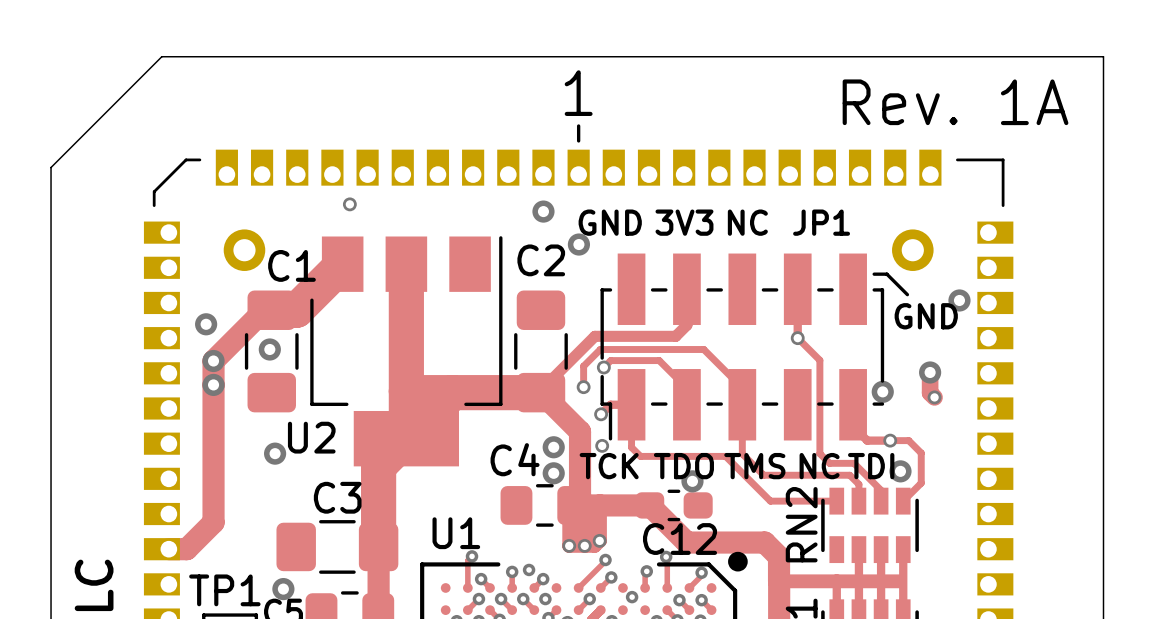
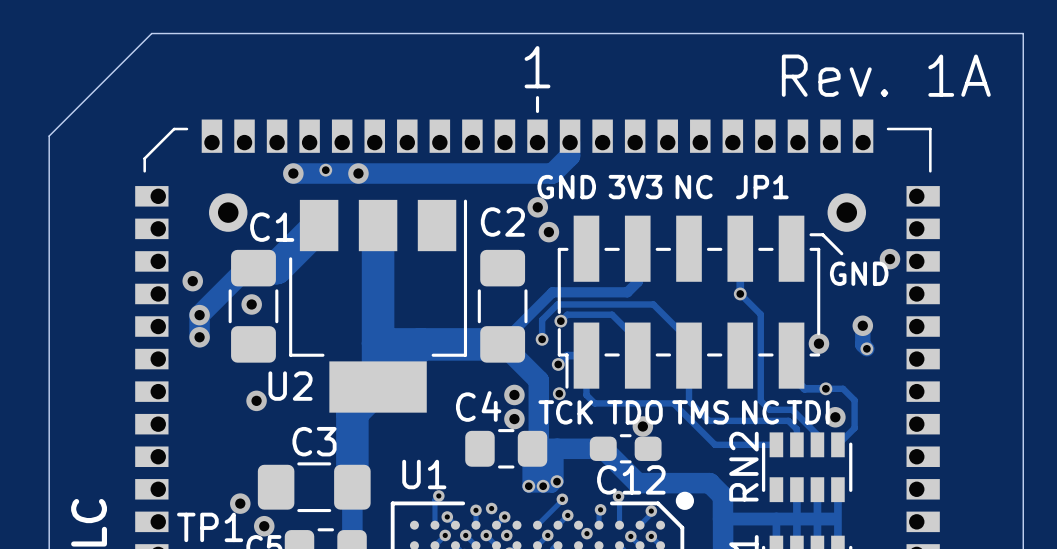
track: none -> (570, 142) (570, 155) (552, 173) (293, 173)
via: none -> (293, 173)
via: none -> (358, 173)
via position: (543, 211) -> (548, 232)
track: (213, 384) (213, 522) (186, 549) (168, 549) -> none
via: none -> (240, 503)

